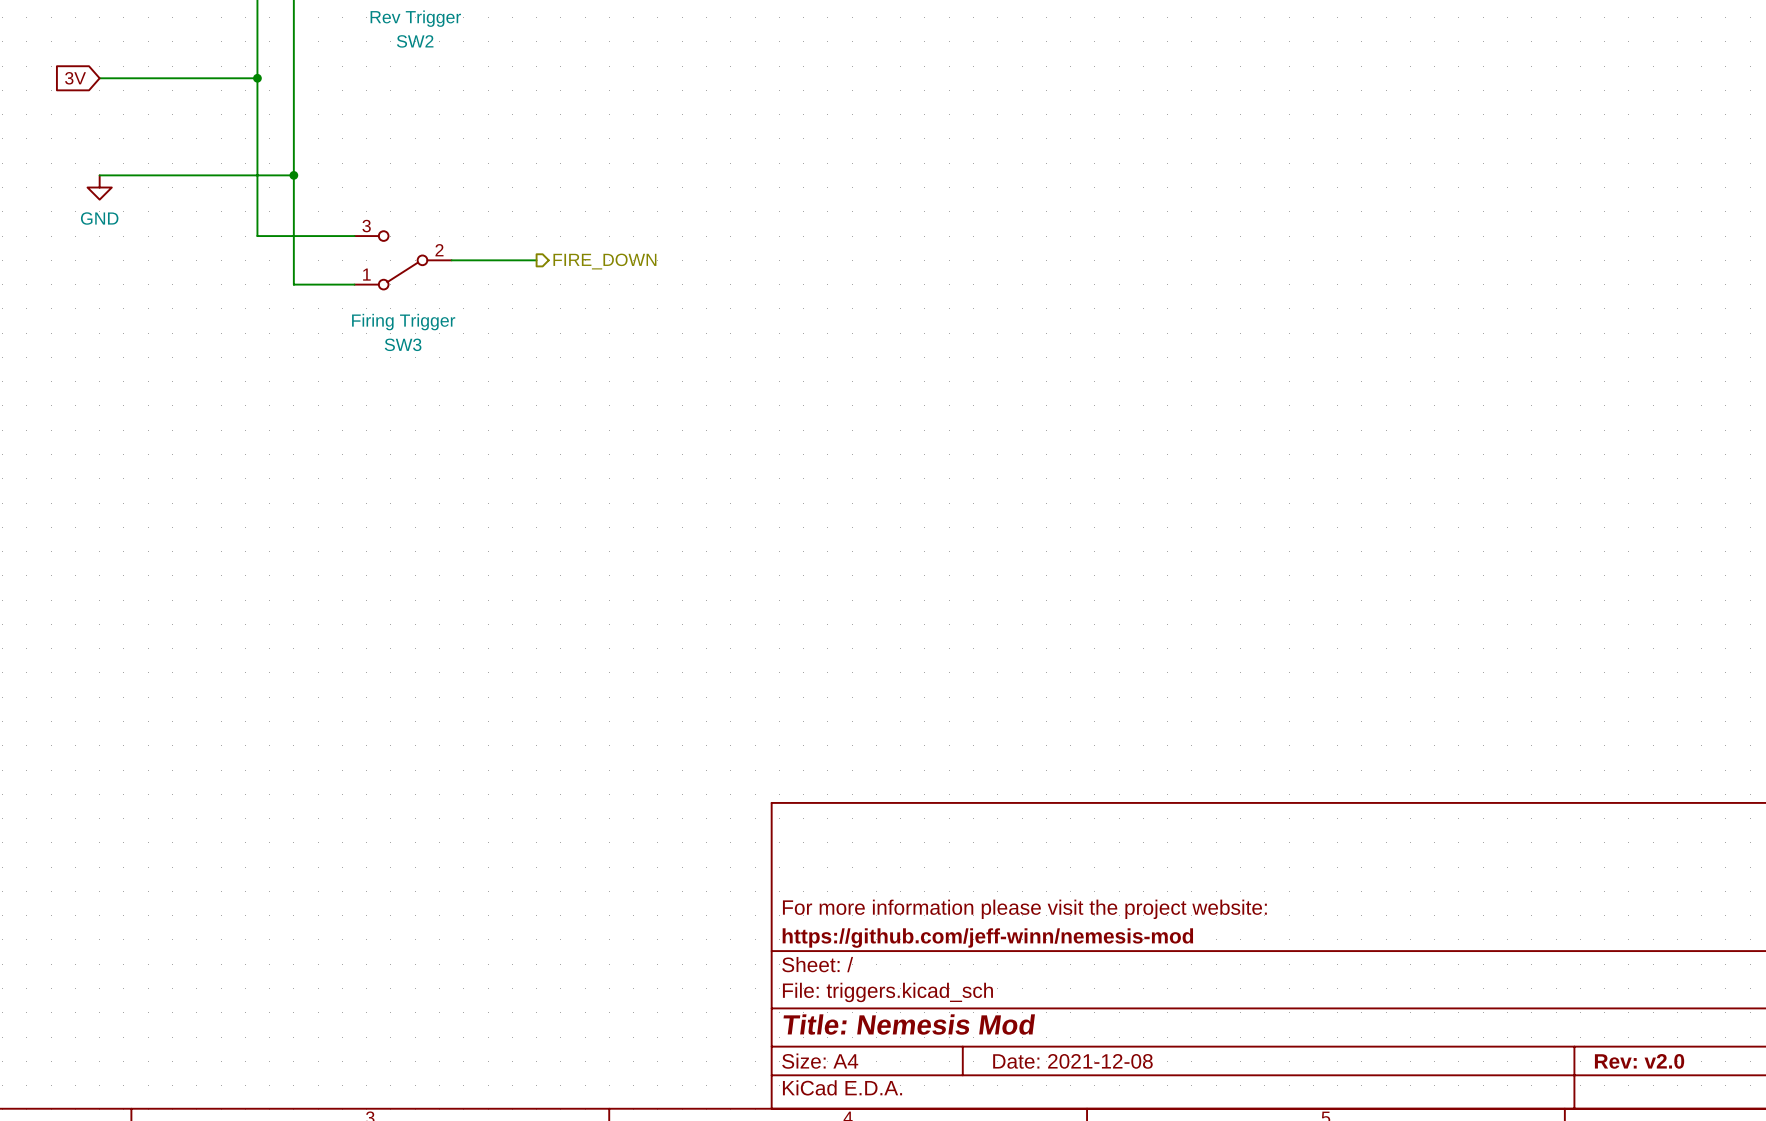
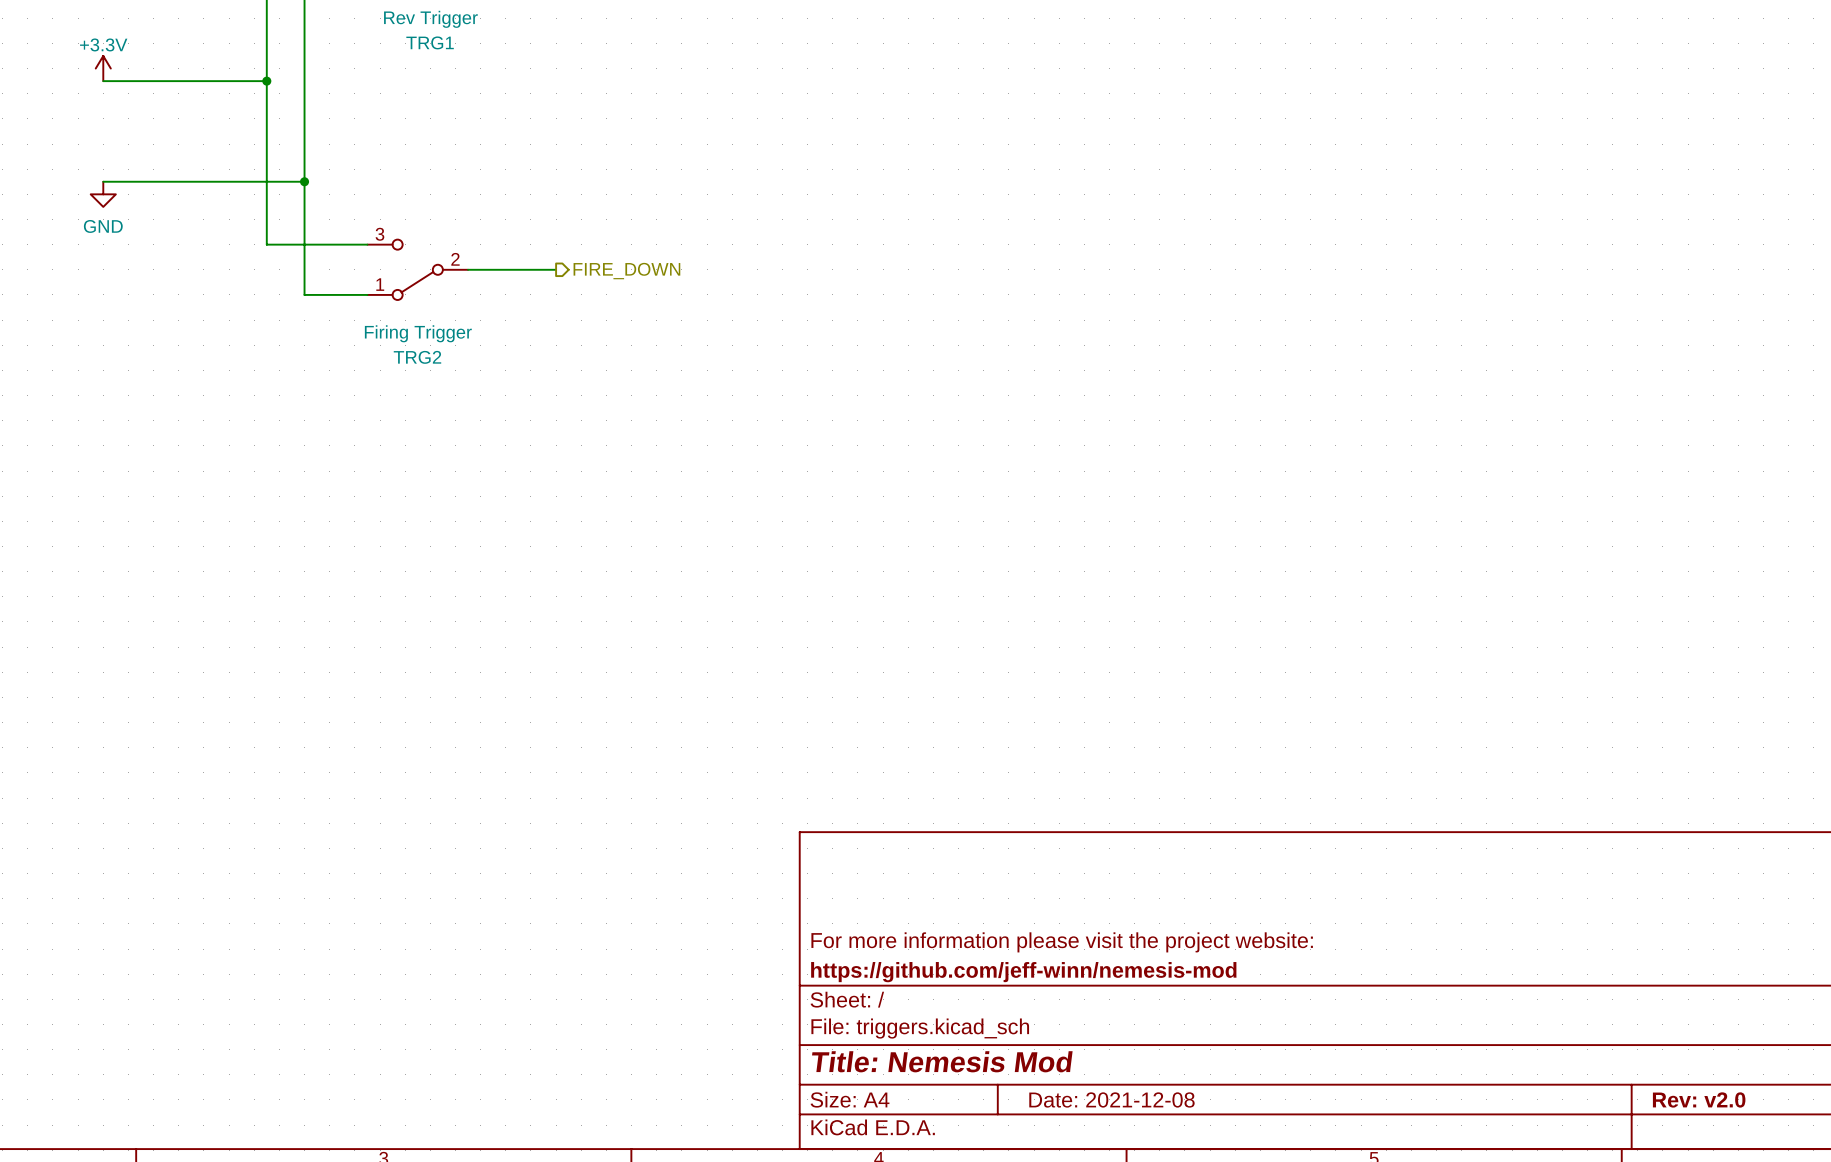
SW2 name: SW2 (415, 41) -> TRG1 (430, 42)
power symbol: none -> +3.3V (103, 68)
global label: 3V (75, 78) -> none
SW3 name: SW3 (403, 344) -> TRG2 (417, 357)

